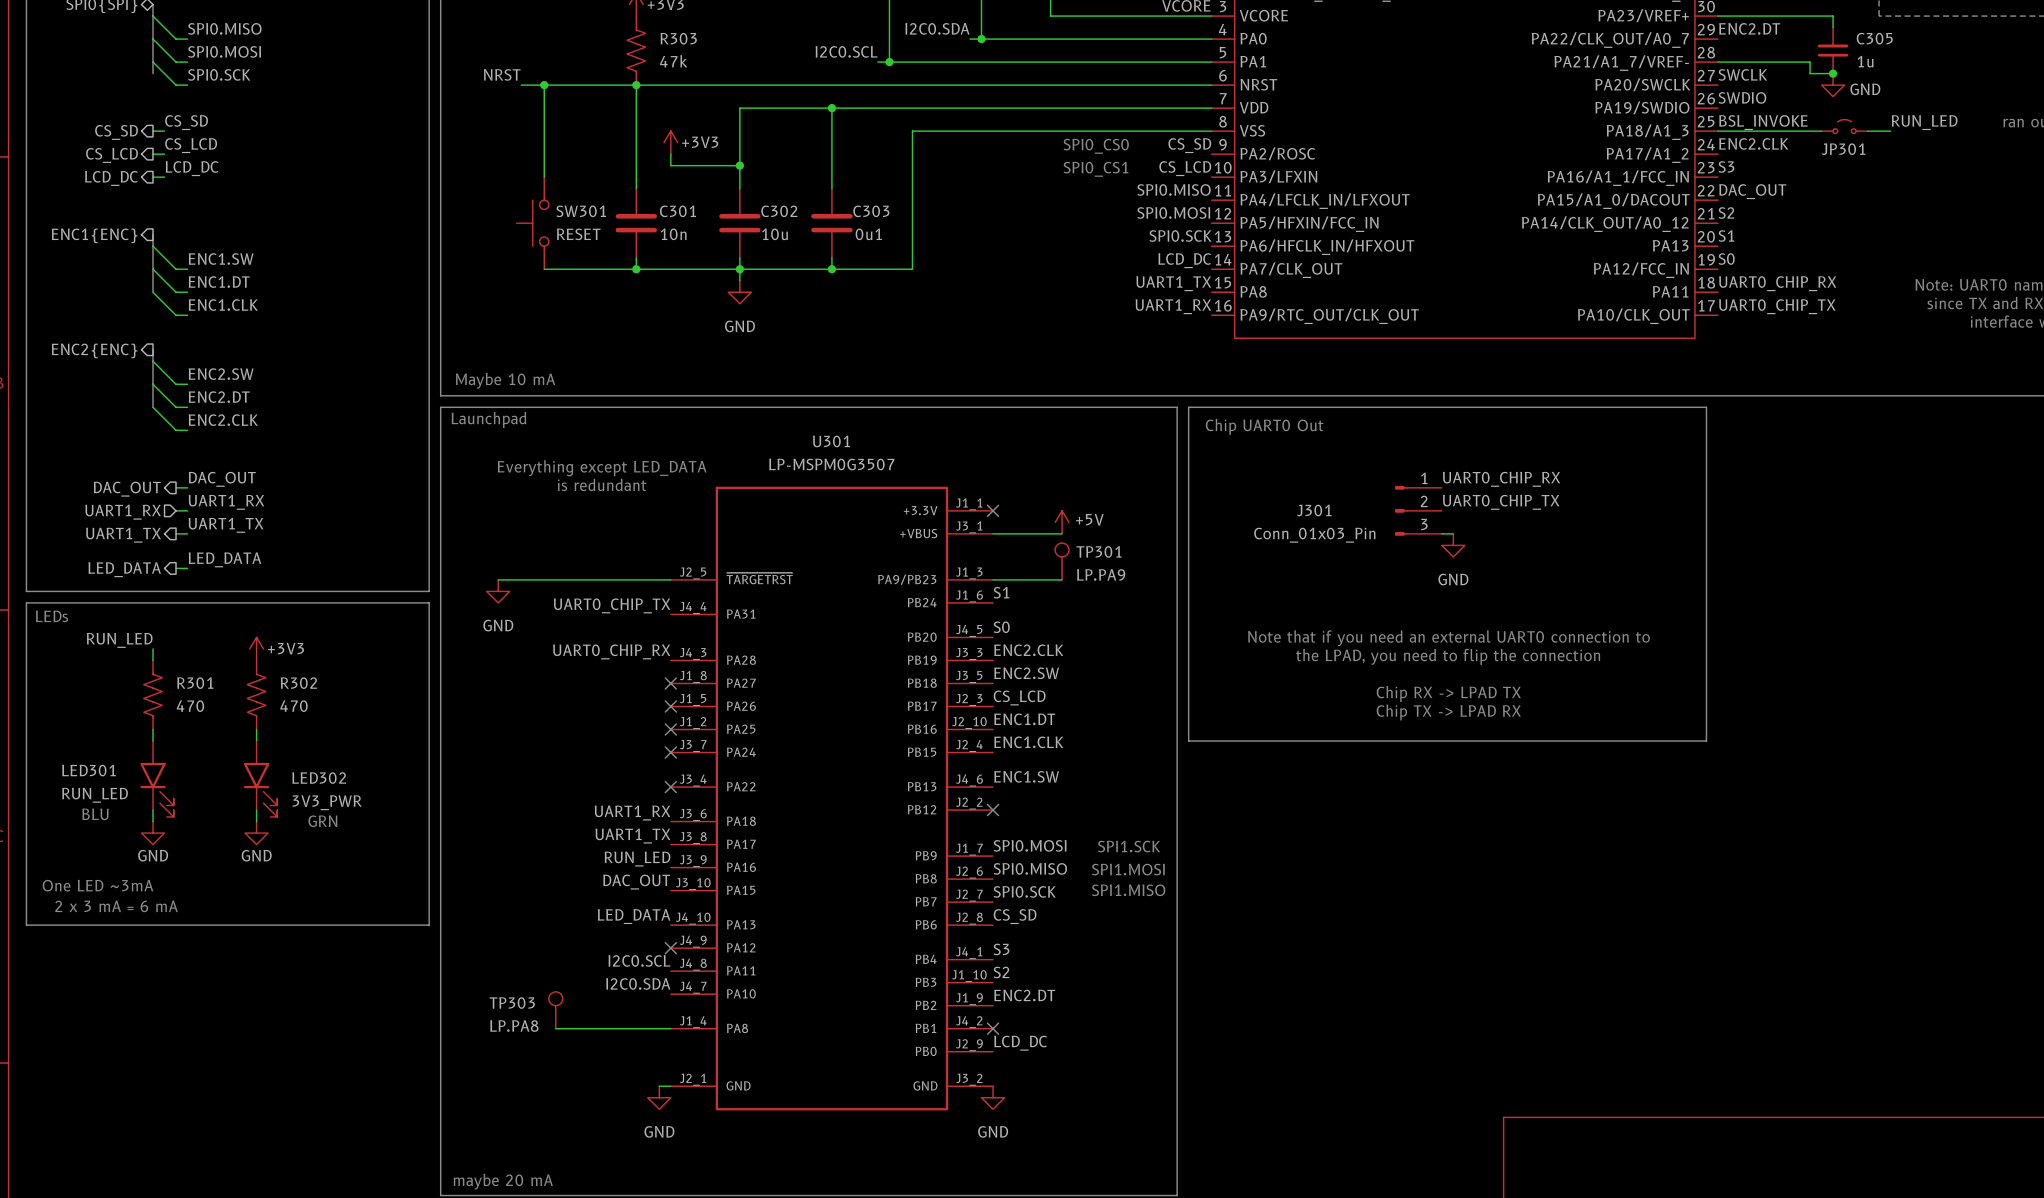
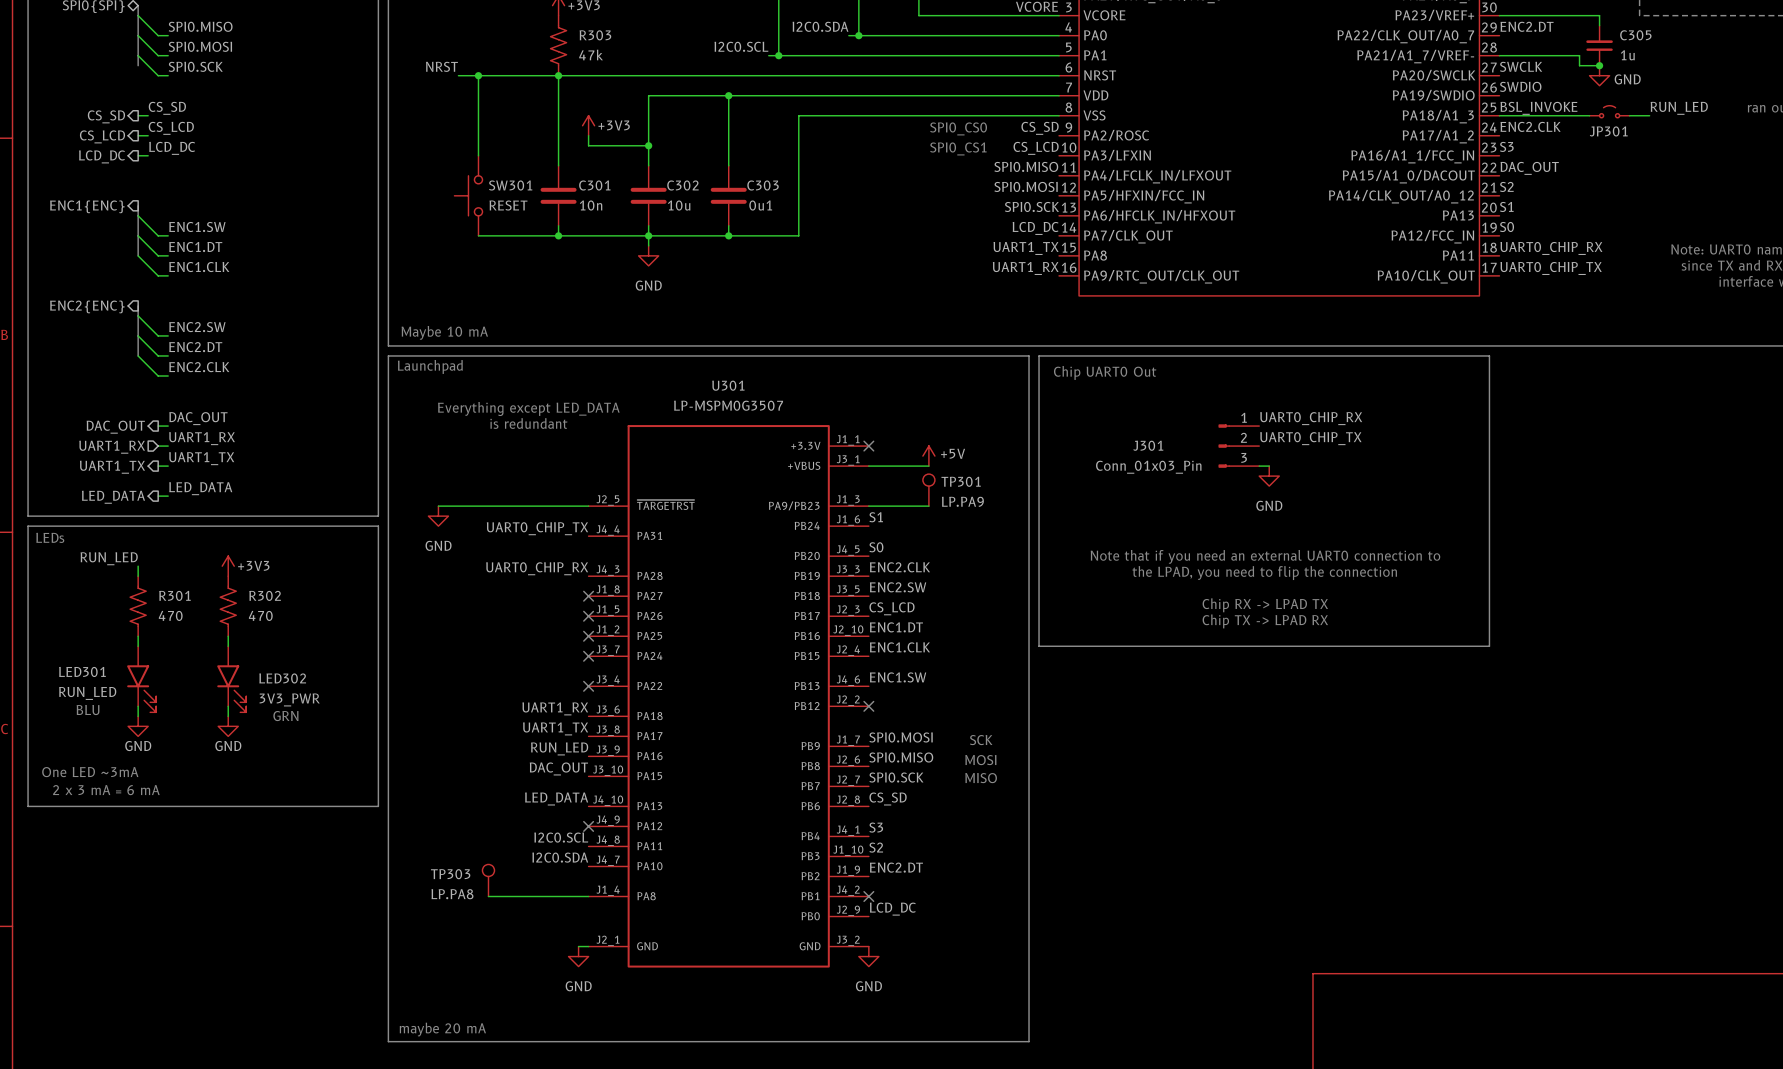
text: SPI1.SCK (1129, 846) -> SCK (981, 740)
text: SPI1.MOSI (1128, 869) -> MOSI (980, 760)
text: SPI1.MISO (1128, 890) -> MISO (981, 778)

